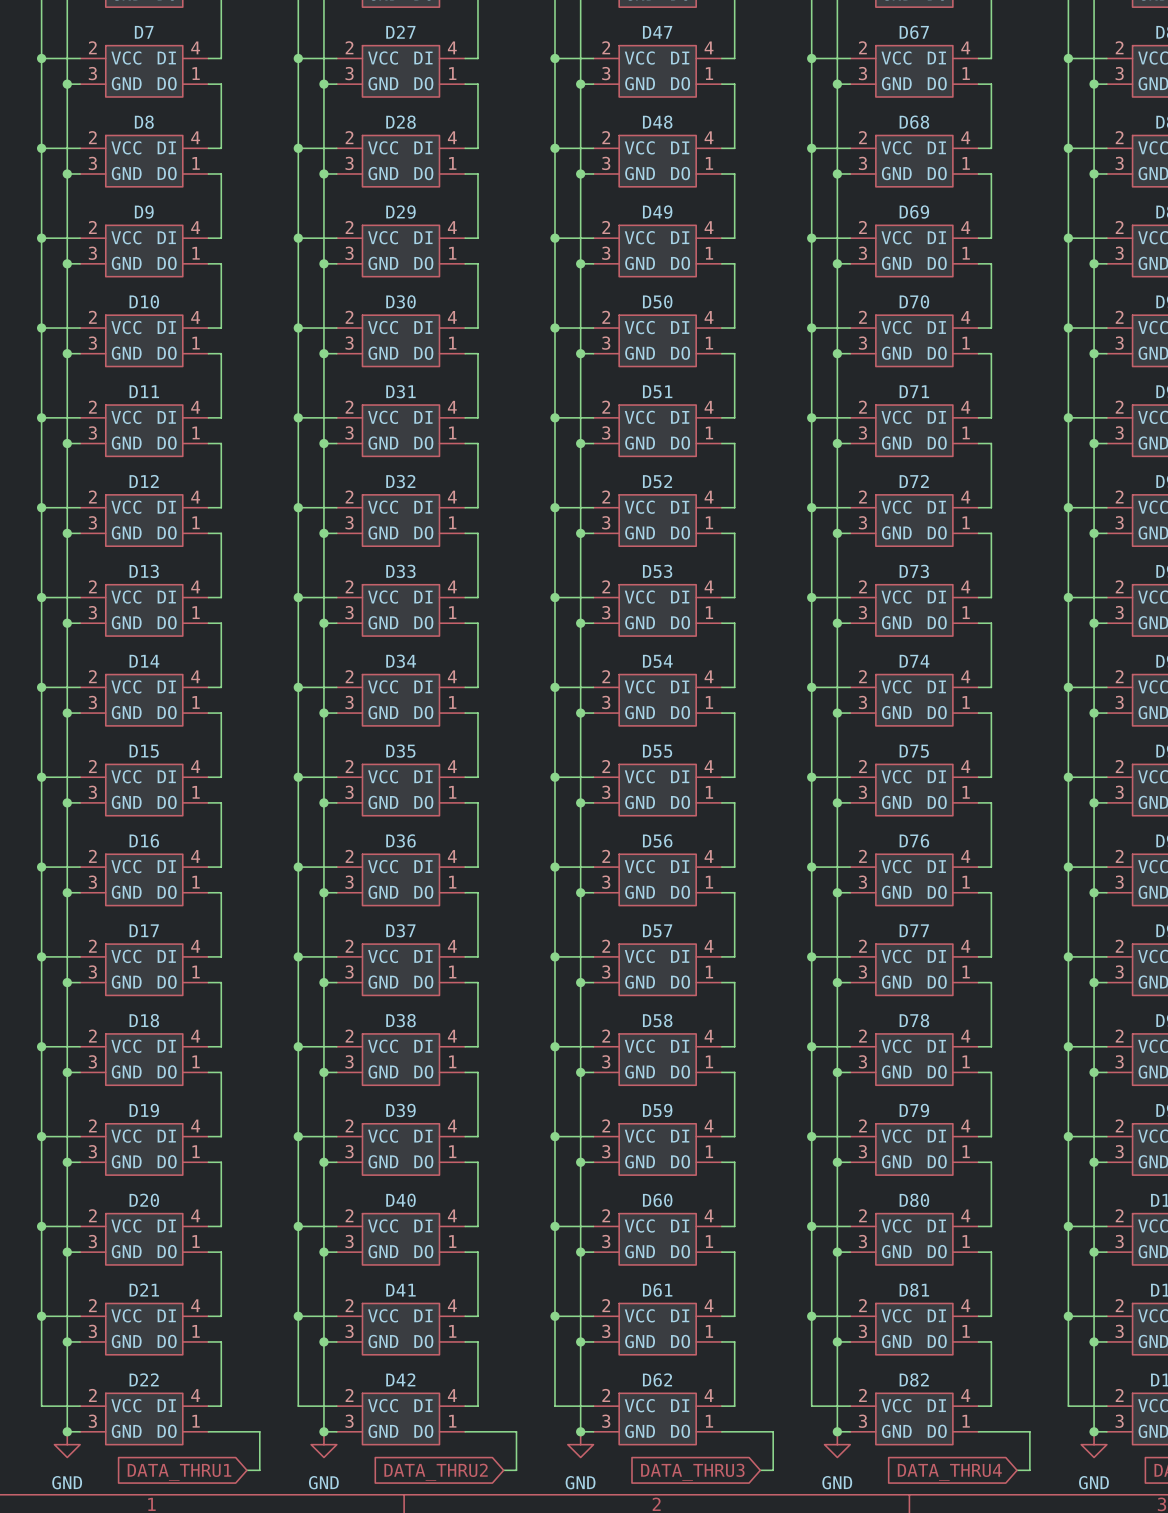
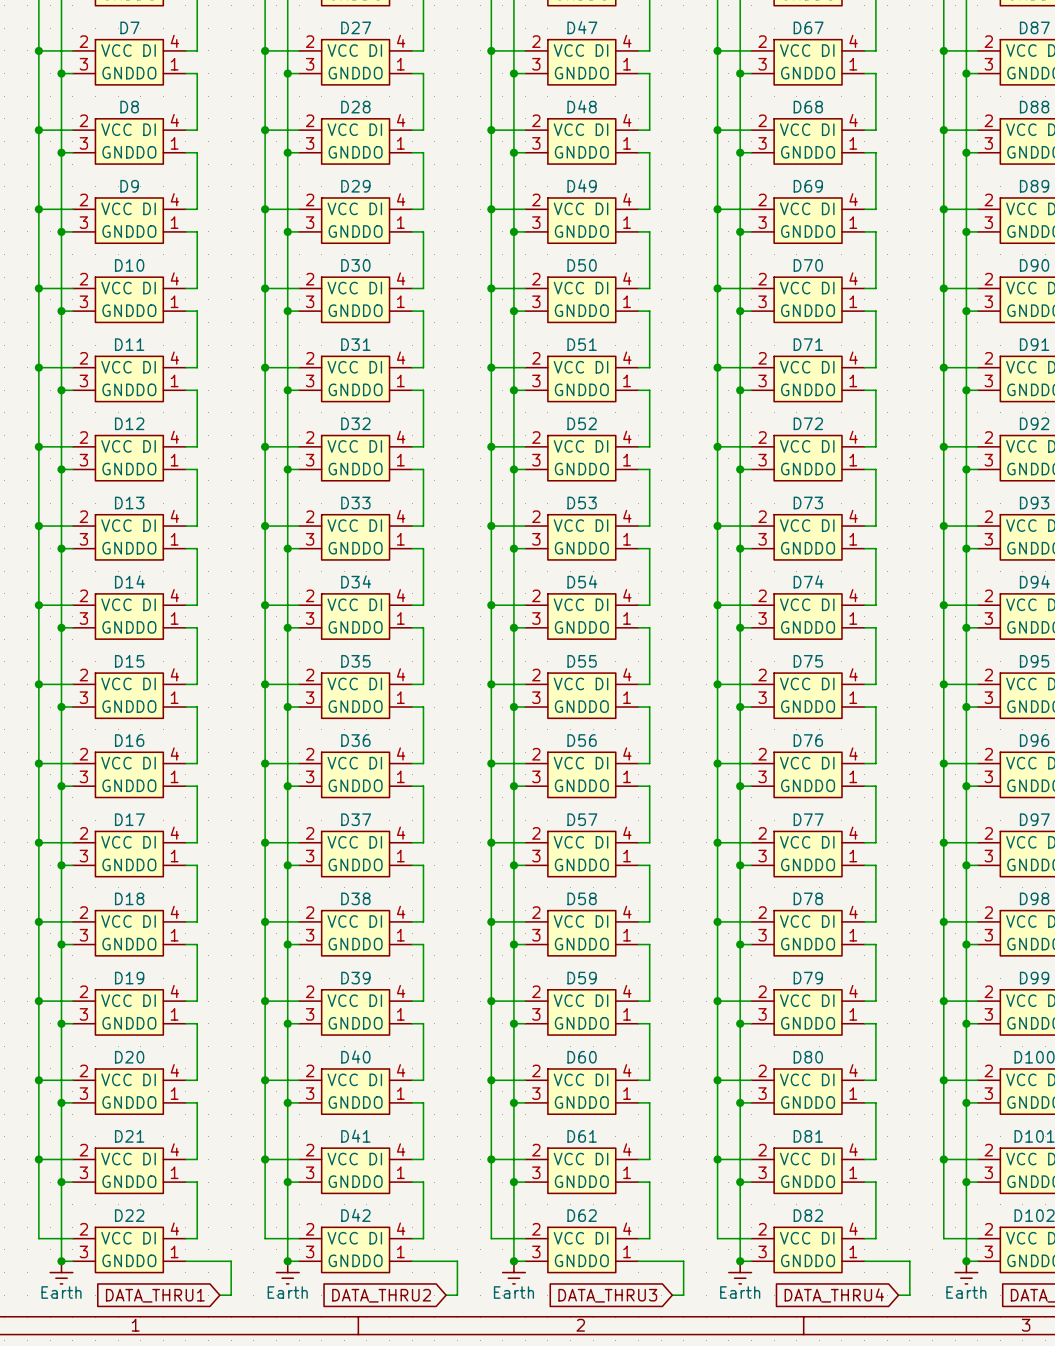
power symbol: GND (67, 1444) -> Earth (61, 1272)
power symbol: GND (323, 1444) -> Earth (287, 1272)
power symbol: GND (580, 1444) -> Earth (513, 1272)
power symbol: GND (837, 1444) -> Earth (740, 1272)
power symbol: GND (1094, 1444) -> Earth (966, 1272)

